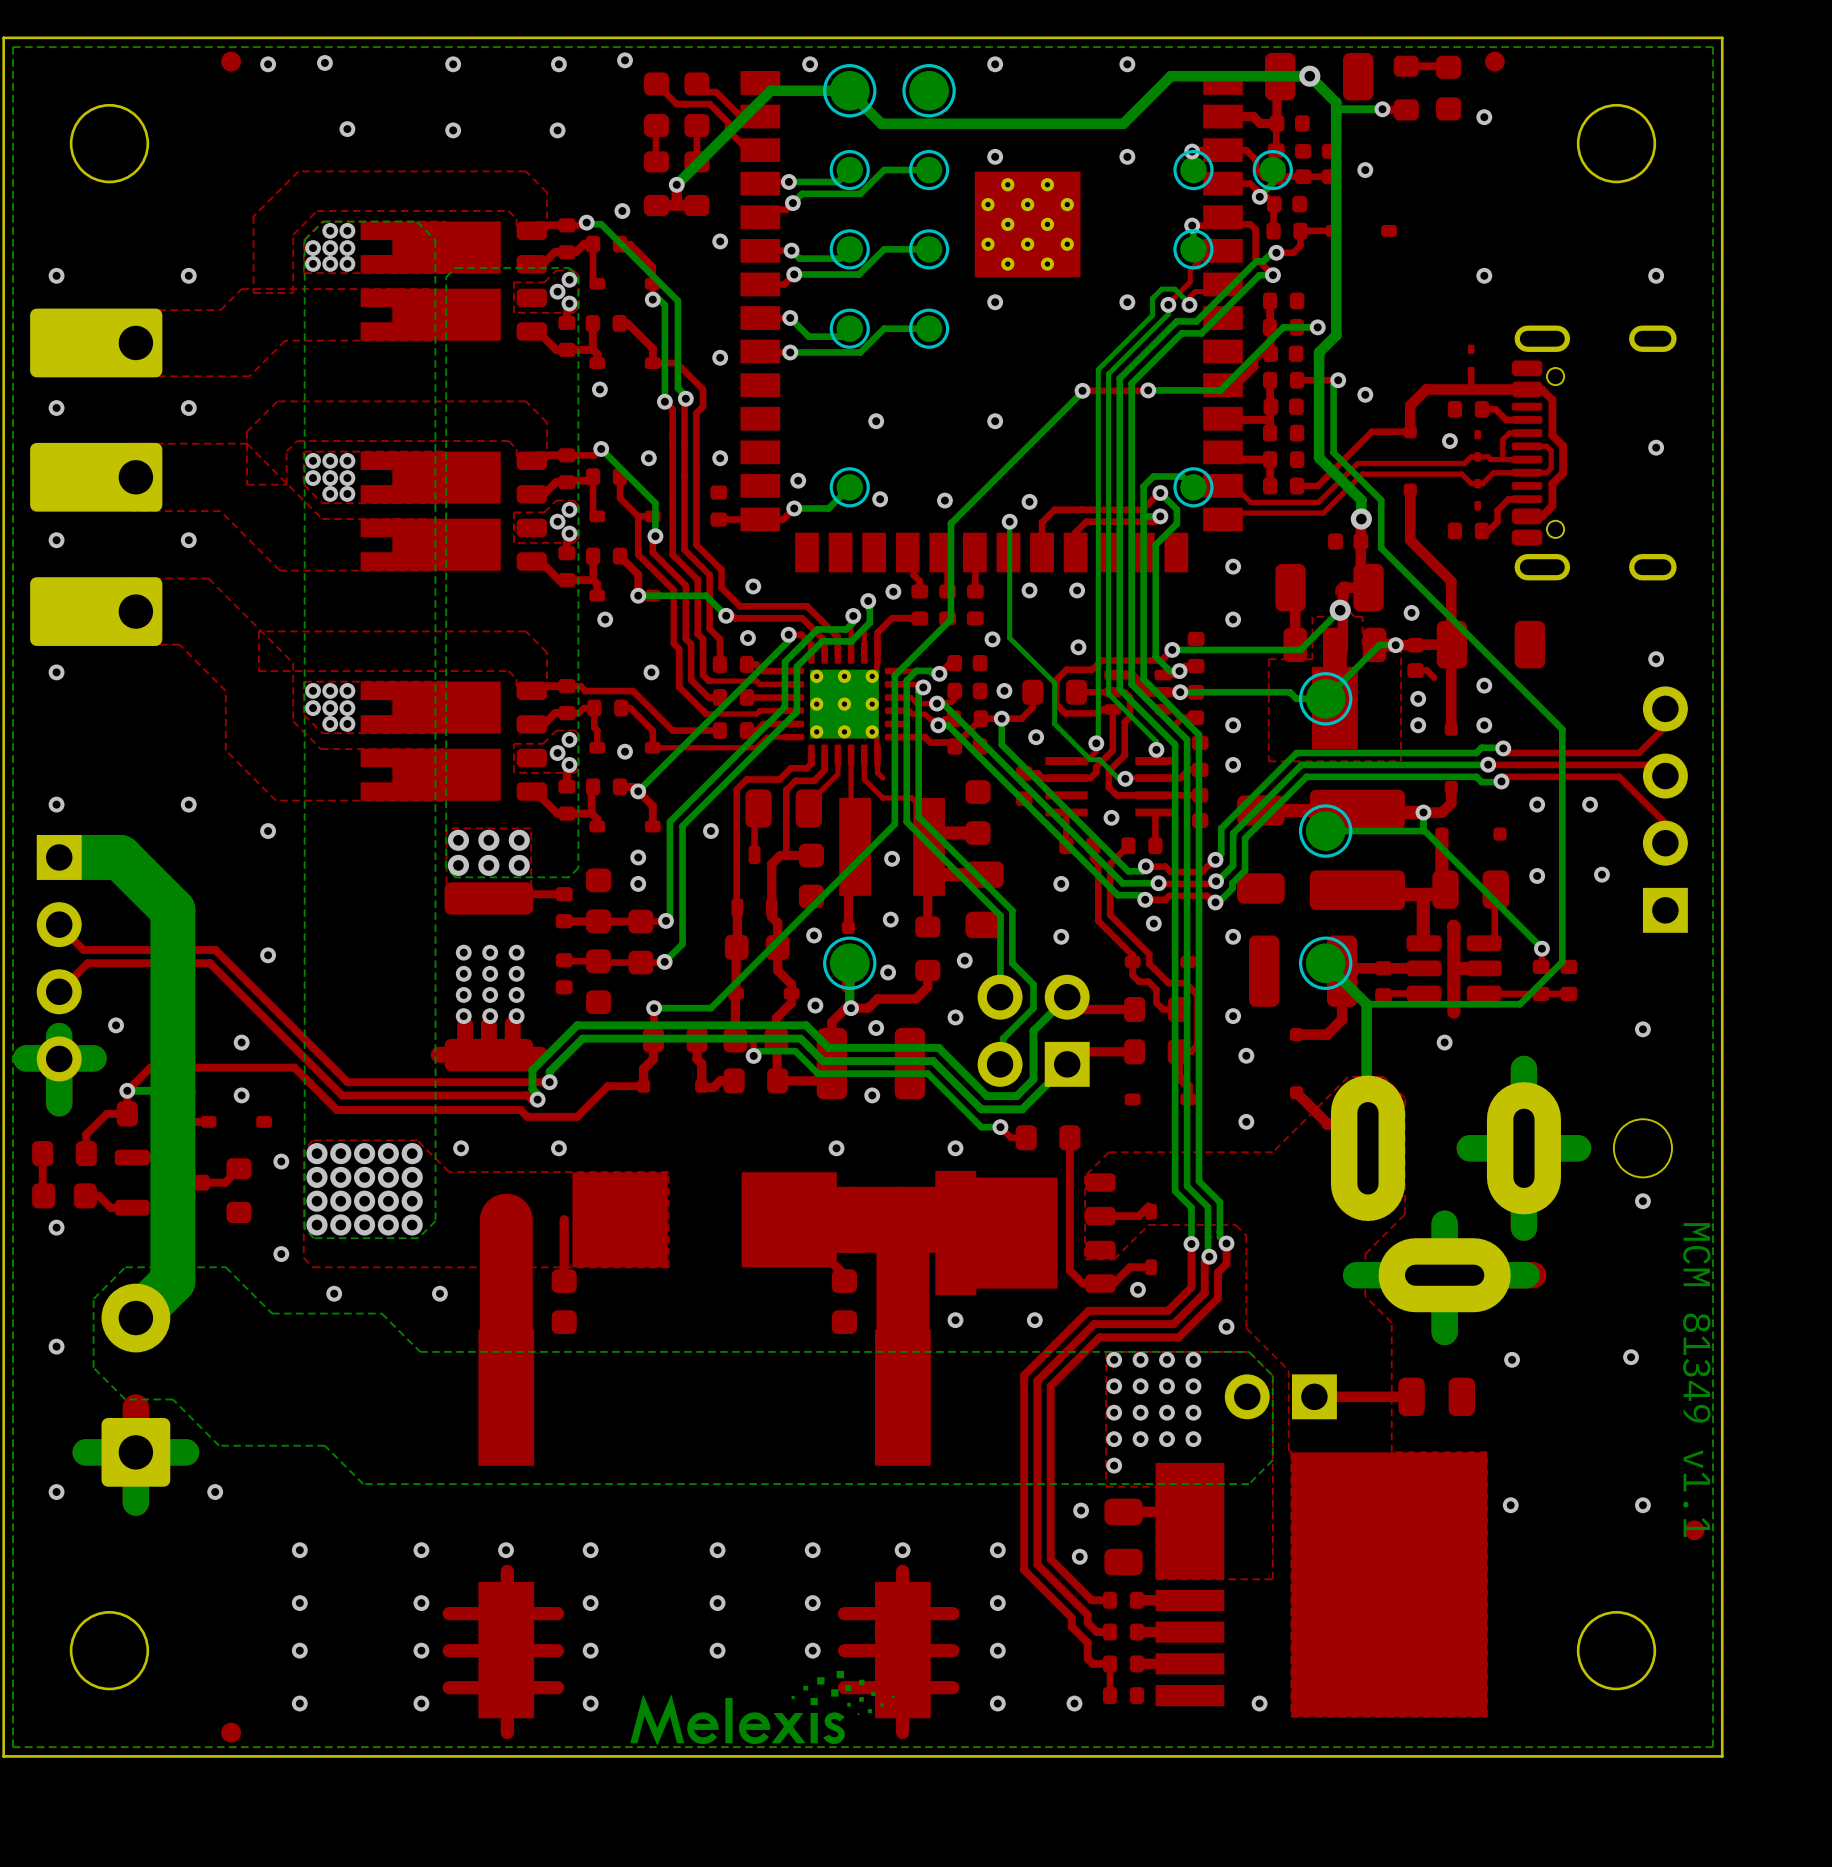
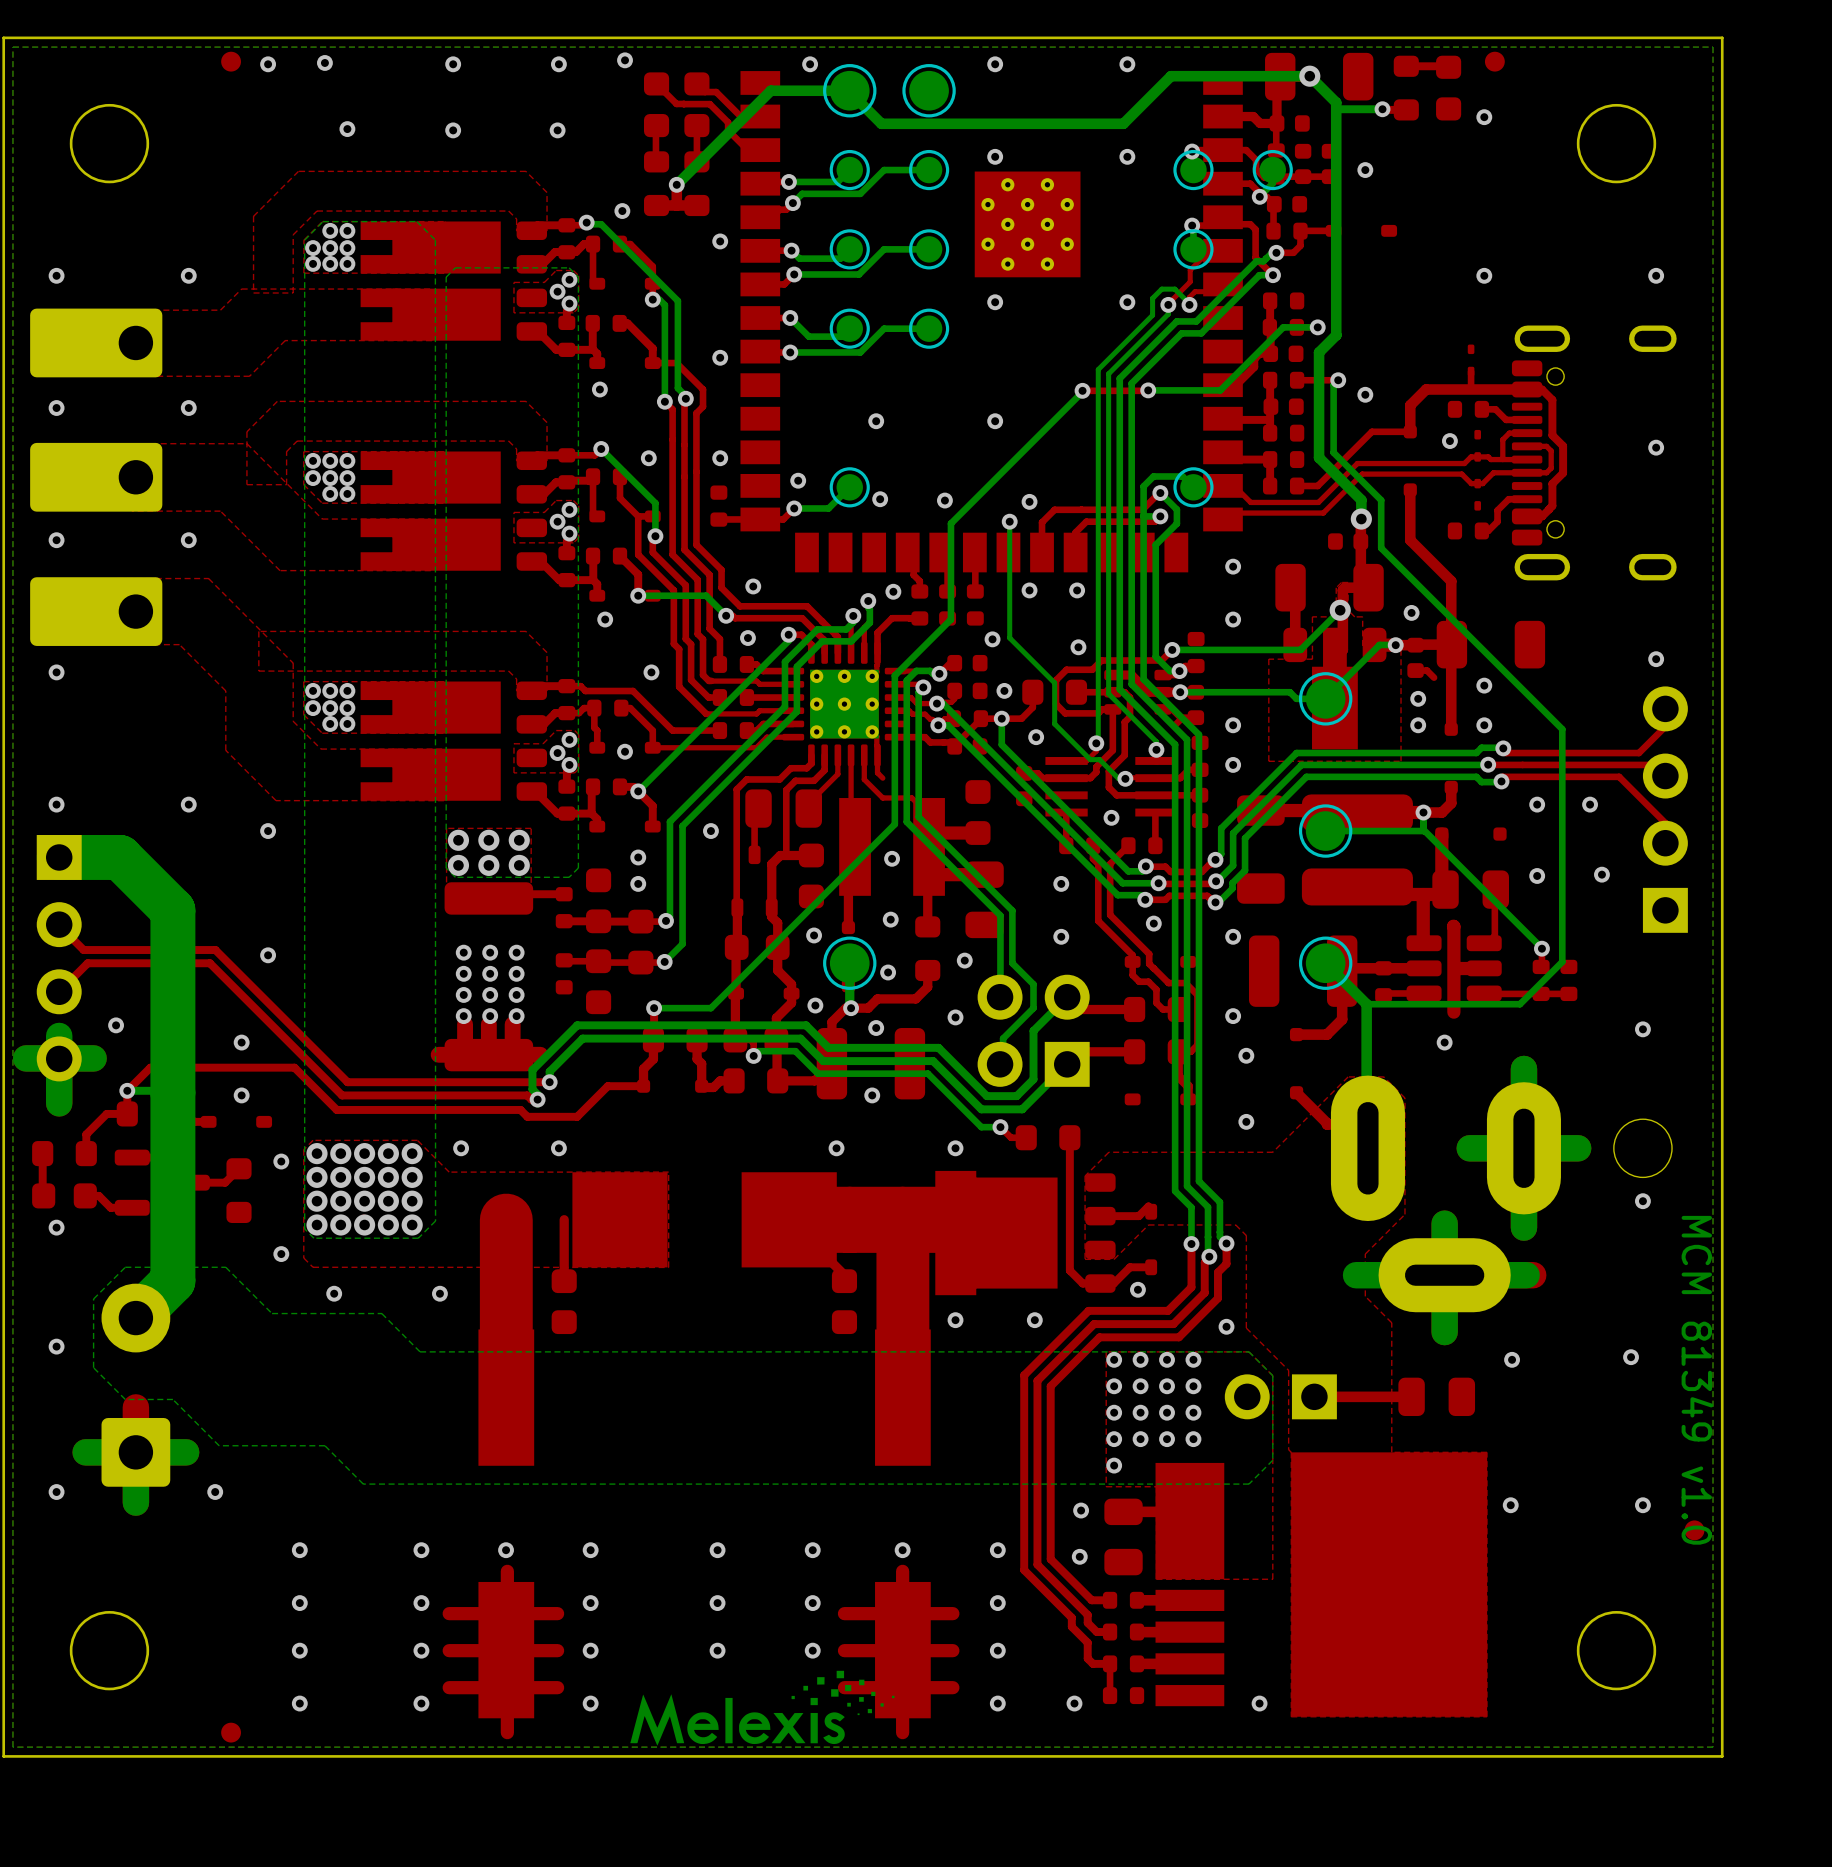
part footprint: [1309, 789, 1406, 911] -> [1301, 794, 1413, 906]
text: MCM 81349 v1.1 (1696, 1380) -> MCM 81349 v1.0 (1697, 1380)

